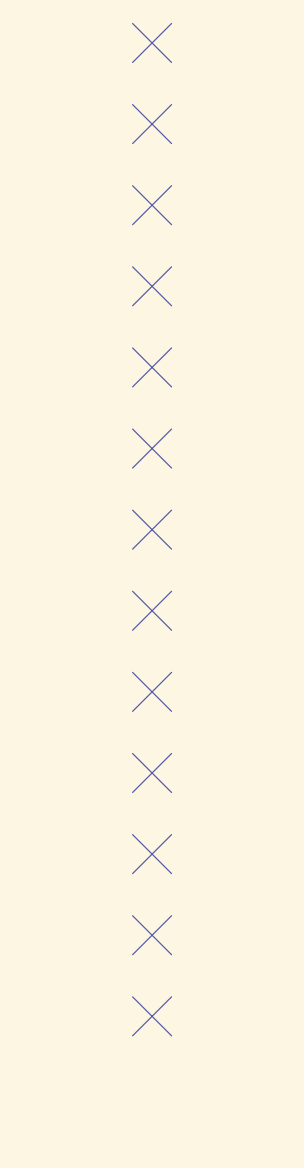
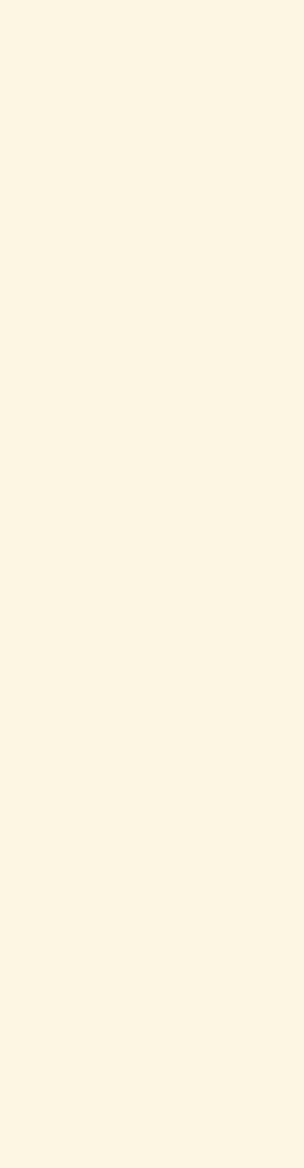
no-connect mark: (152, 42) -> none
no-connect mark: (152, 124) -> none
no-connect mark: (152, 205) -> none
no-connect mark: (152, 286) -> none
no-connect mark: (152, 367) -> none
no-connect mark: (152, 448) -> none
no-connect mark: (152, 529) -> none
no-connect mark: (152, 610) -> none
no-connect mark: (152, 691) -> none
no-connect mark: (152, 772) -> none
no-connect mark: (152, 854) -> none
no-connect mark: (152, 935) -> none
no-connect mark: (152, 1016) -> none

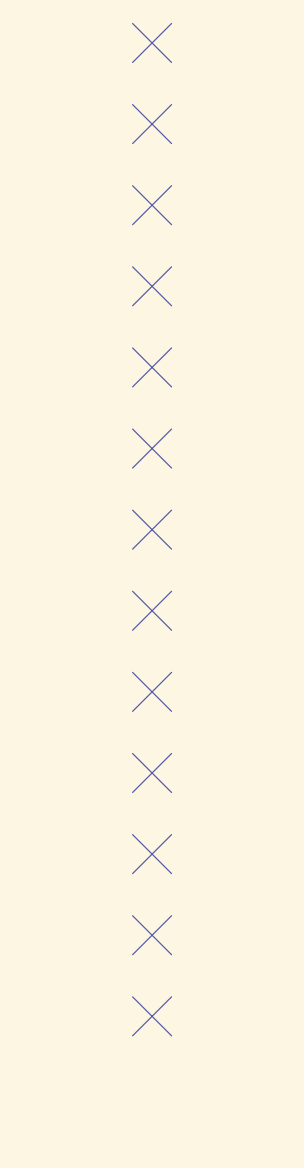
no-connect mark: none -> (152, 42)
no-connect mark: none -> (152, 124)
no-connect mark: none -> (152, 205)
no-connect mark: none -> (152, 286)
no-connect mark: none -> (152, 367)
no-connect mark: none -> (152, 448)
no-connect mark: none -> (152, 529)
no-connect mark: none -> (152, 610)
no-connect mark: none -> (152, 691)
no-connect mark: none -> (152, 772)
no-connect mark: none -> (152, 854)
no-connect mark: none -> (152, 935)
no-connect mark: none -> (152, 1016)

